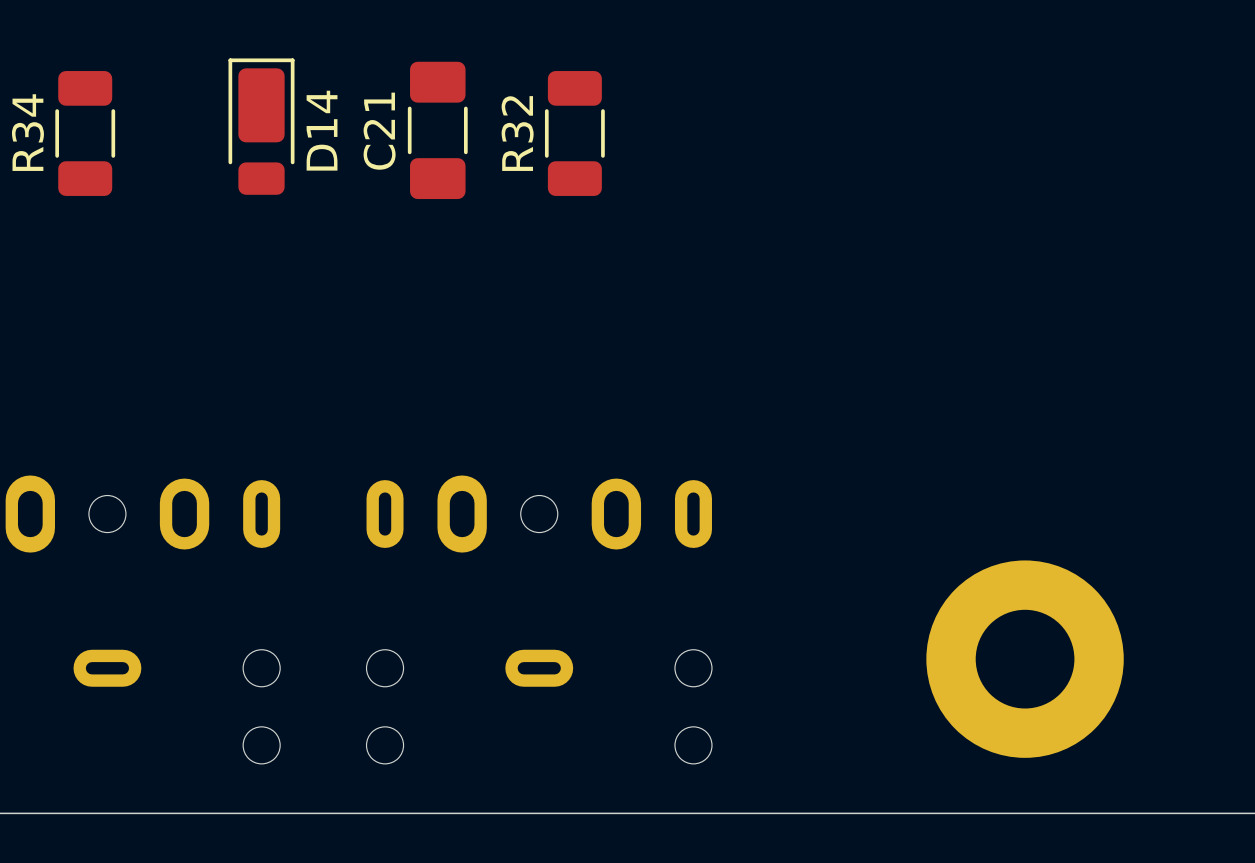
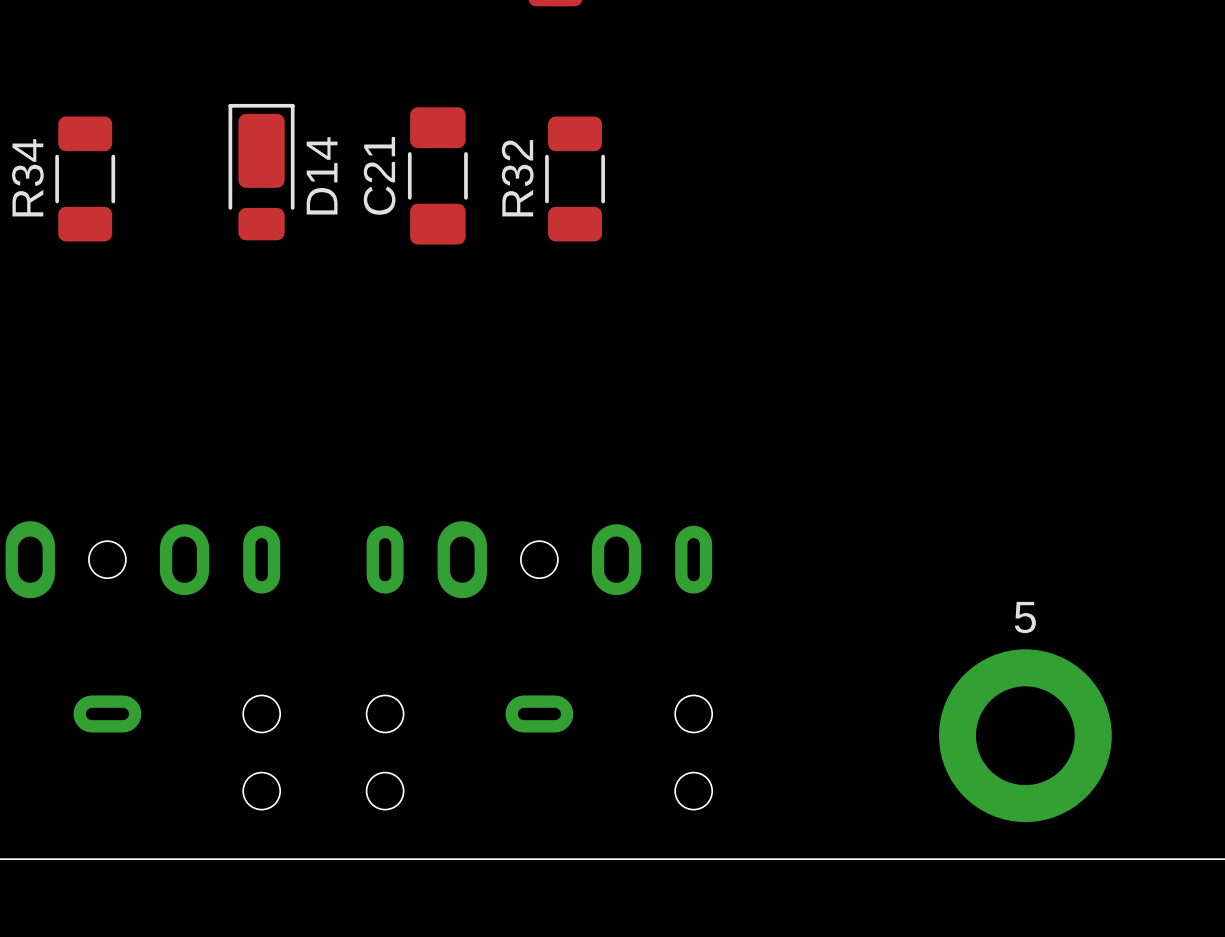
part: (1025, 659) -> none
5: none -> (1025, 735)

